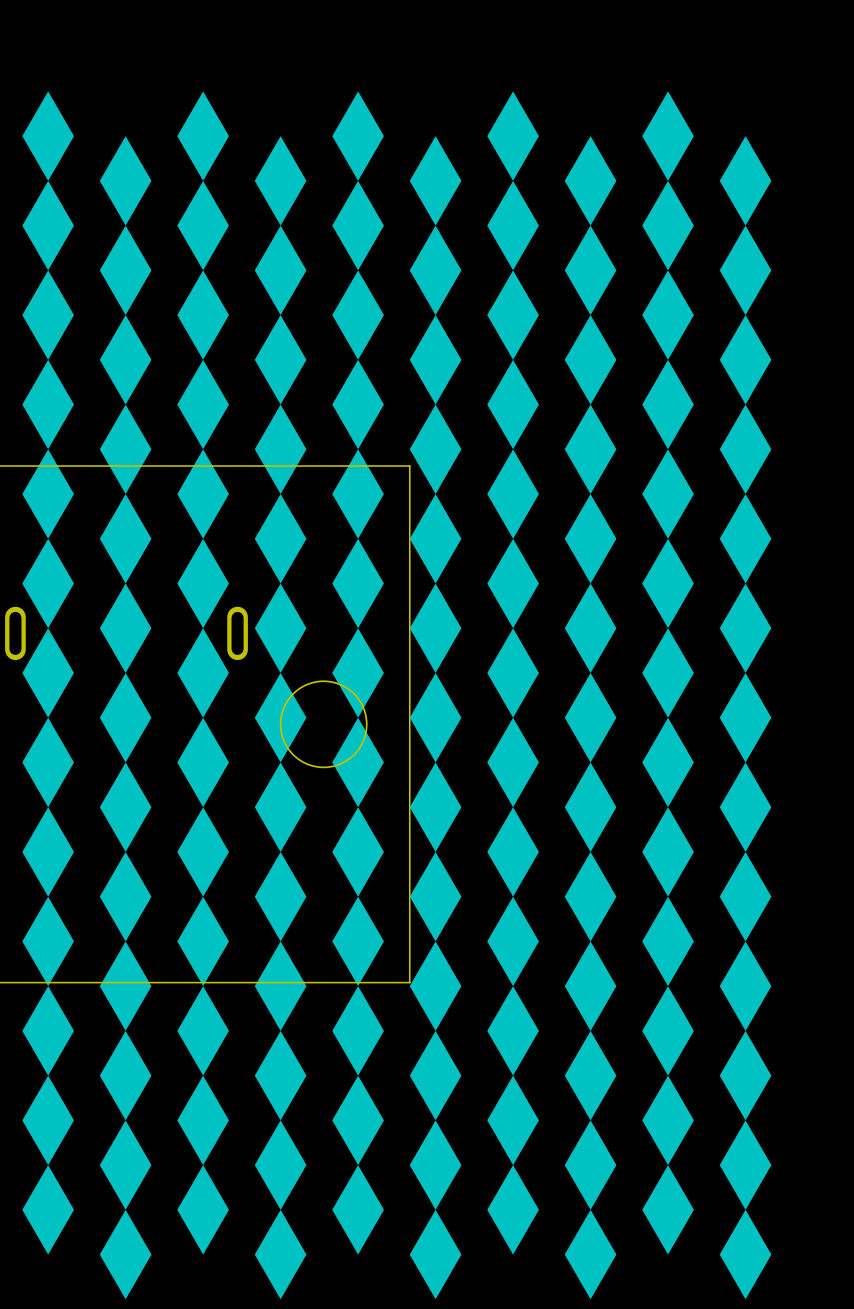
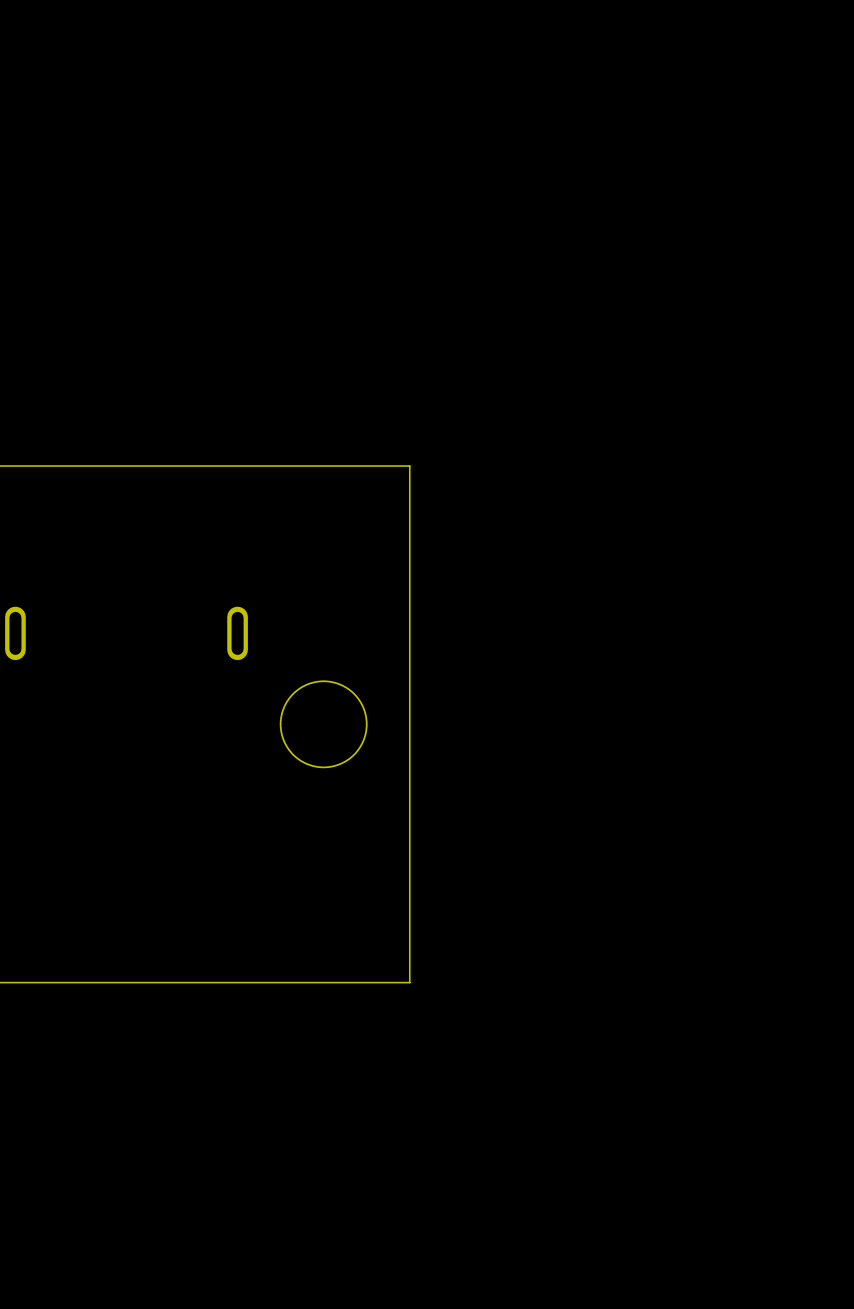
drawing: [22, 91, 74, 1255] -> none
drawing: [177, 91, 229, 1255] -> none
drawing: [332, 91, 384, 1255] -> none
drawing: [487, 91, 539, 1255] -> none
drawing: [642, 91, 694, 1255] -> none
drawing: [99, 136, 152, 1300] -> none
drawing: [254, 136, 307, 1300] -> none
drawing: [409, 136, 462, 1300] -> none
drawing: [564, 136, 617, 1300] -> none
drawing: [719, 136, 772, 1300] -> none

